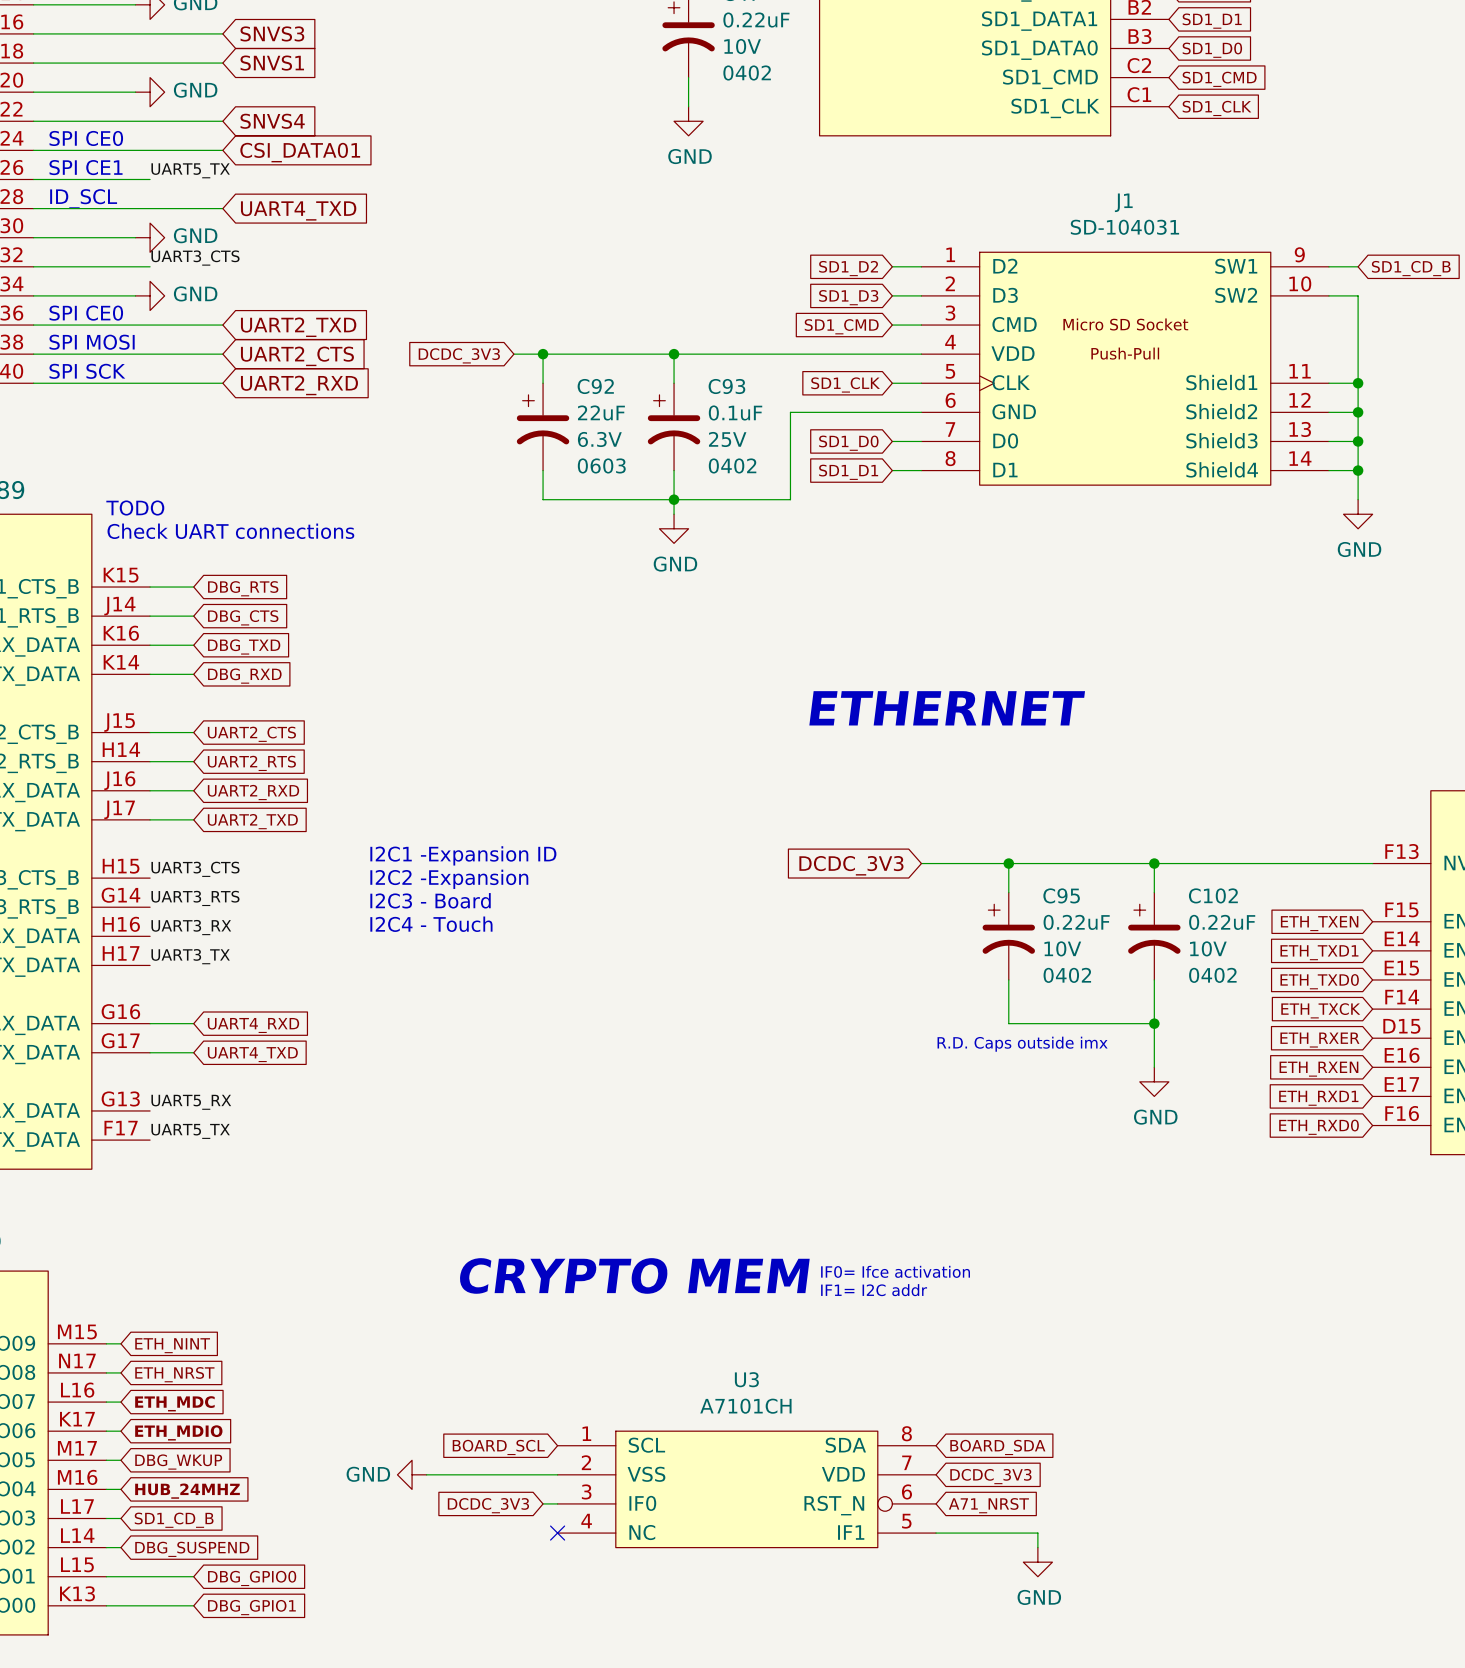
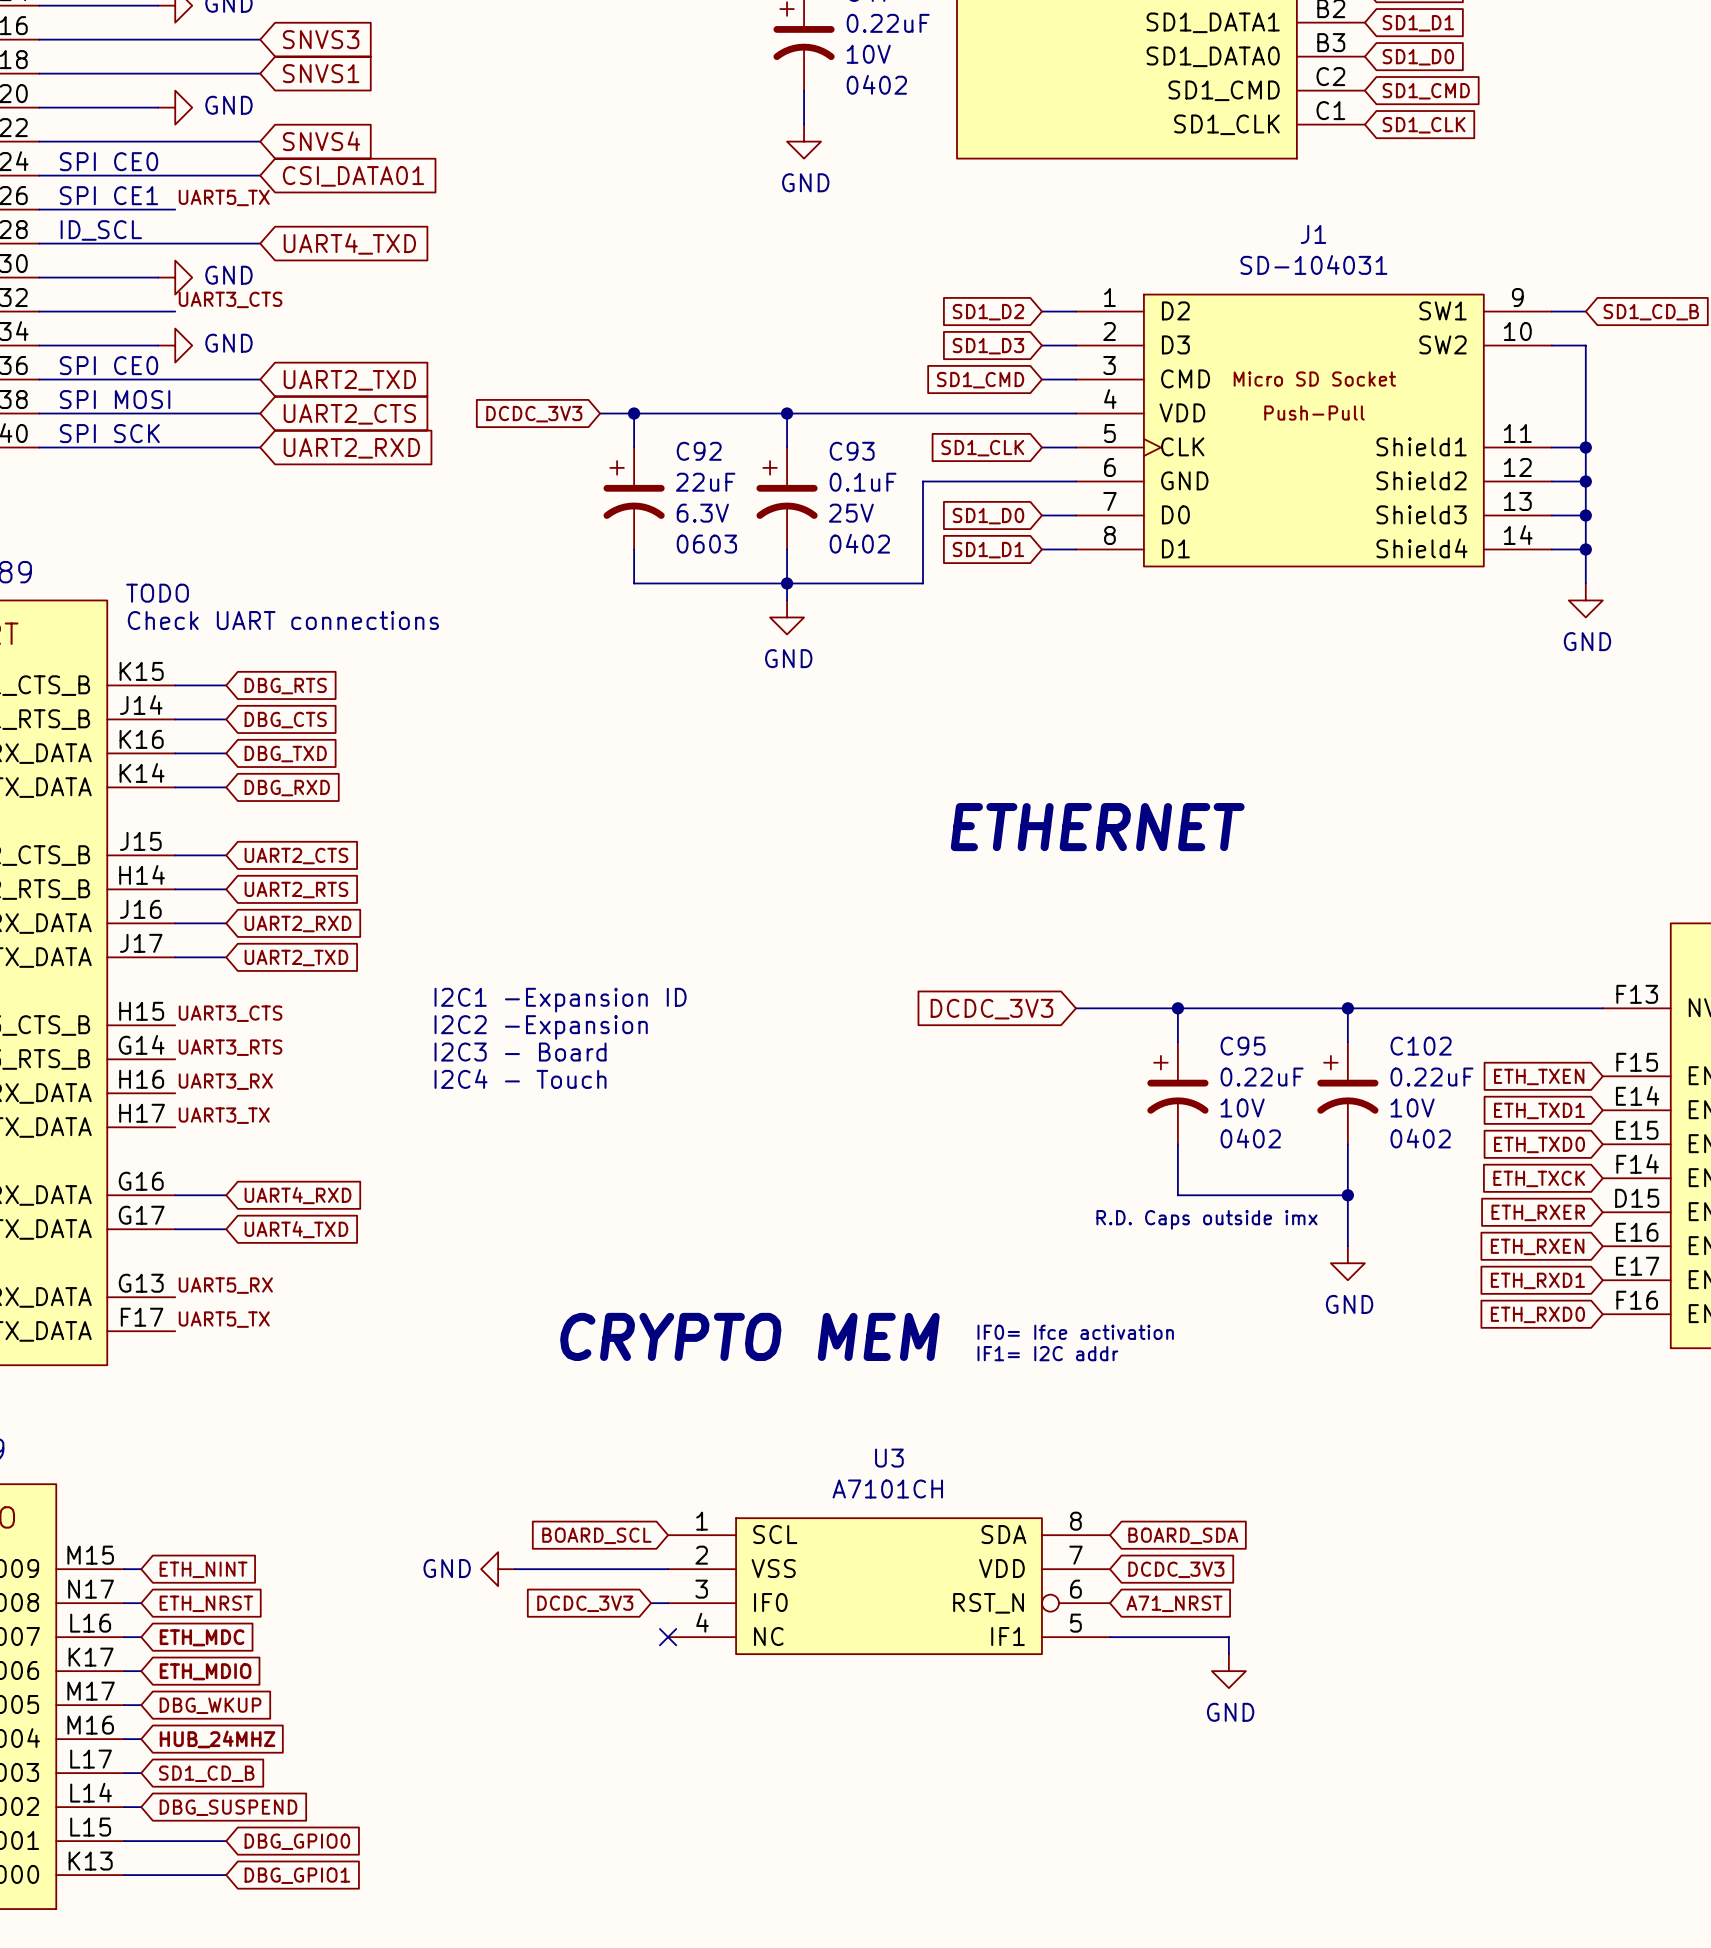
text position: IF0= Ifce activation (895, 1271) -> IF0= Ifce activation (1075, 1332)
text position: CRYPTO MEM (634, 1275) -> CRYPTO MEM (749, 1336)
text position: IF1= I2C addr (874, 1290) -> IF1= I2C addr (1047, 1353)
no-connect mark: none -> (668, 1637)
global label position: BOARD_SCL (498, 1447) -> BOARD_SCL (596, 1535)
global label position: BOARD_SDA (997, 1447) -> BOARD_SDA (1183, 1535)
power symbol position: GND (412, 1474) -> GND (498, 1569)
wire: (426, 1474) (557, 1474) -> (515, 1569) (668, 1569)
global label position: DCDC_3V3 (990, 1476) -> DCDC_3V3 (1176, 1569)
U3 position: (746, 1489) -> (889, 1586)
wire: (543, 1503) (557, 1503) -> (651, 1603) (668, 1603)
global label position: DCDC_3V3 (488, 1505) -> DCDC_3V3 (585, 1603)
global label position: A71_NRST (988, 1505) -> A71_NRST (1174, 1603)
no-connect mark: (557, 1533) -> none
wire: (936, 1533) (1037, 1533) (1037, 1547) -> (1109, 1637) (1228, 1637) (1228, 1654)
power symbol position: GND (1037, 1562) -> GND (1228, 1671)

